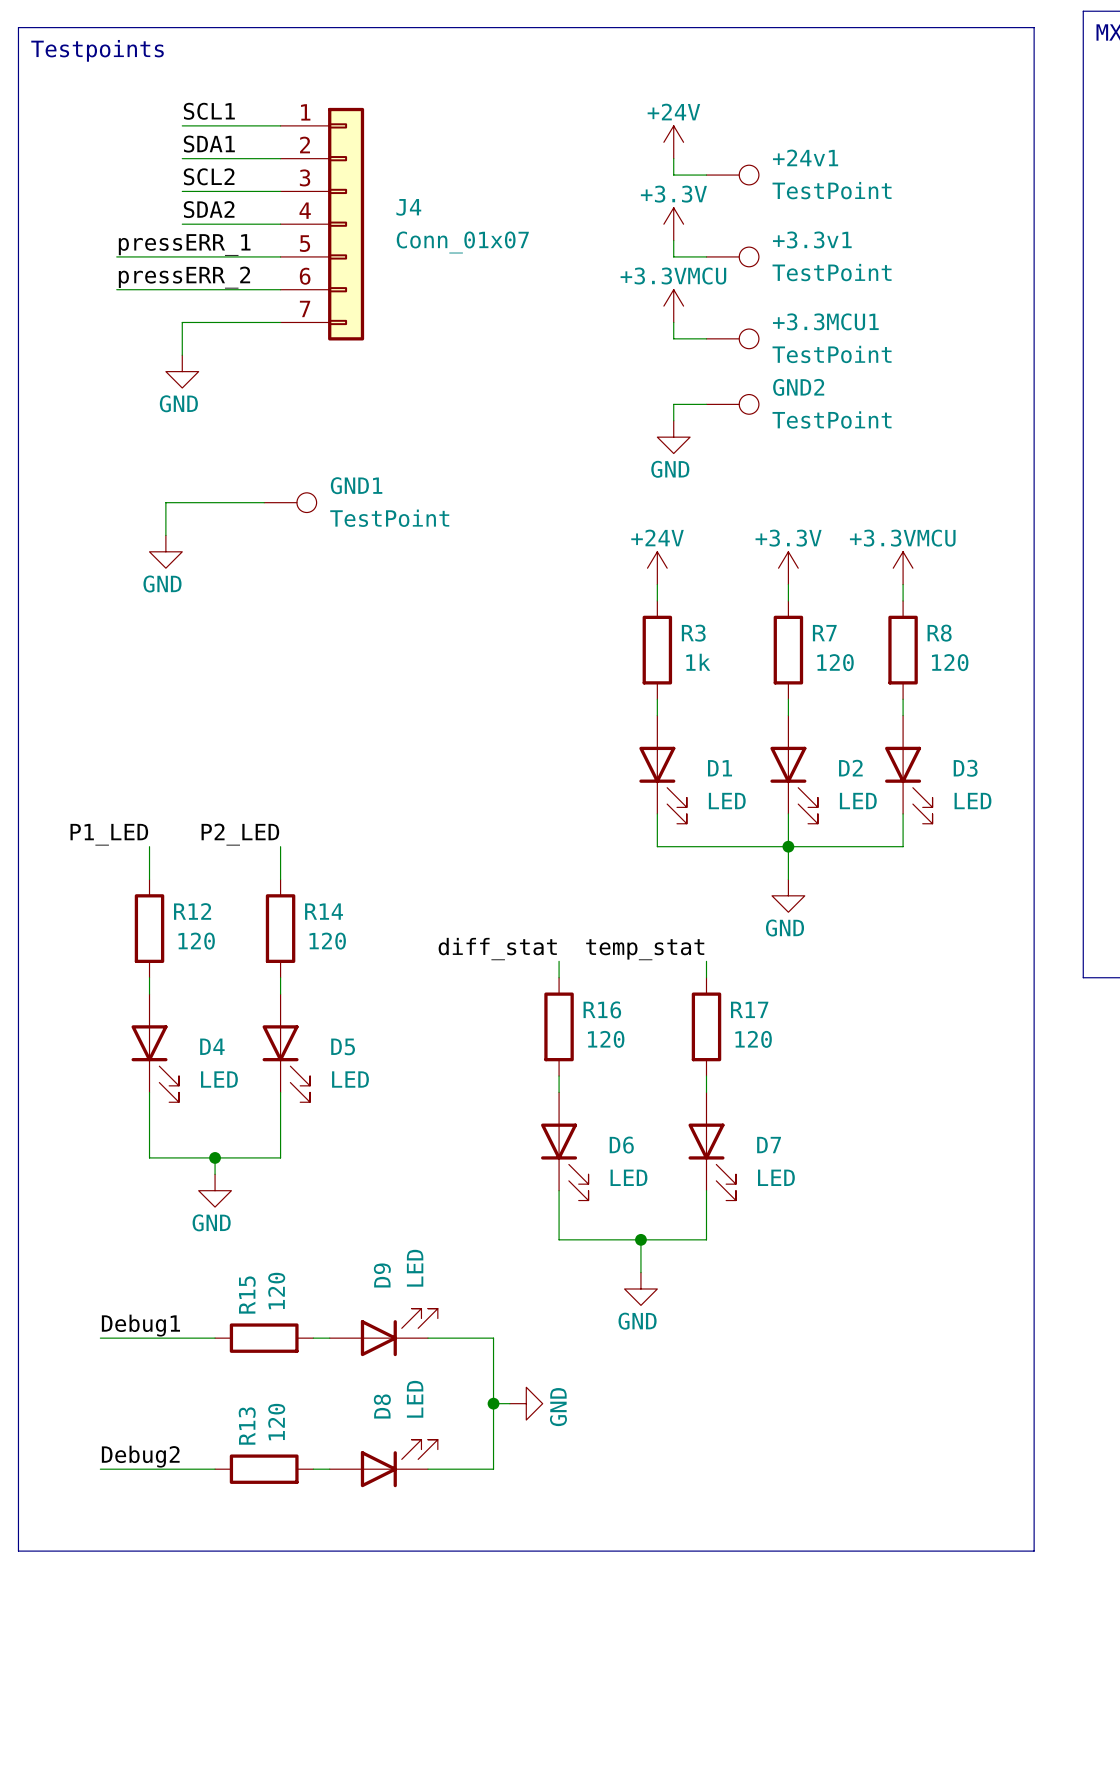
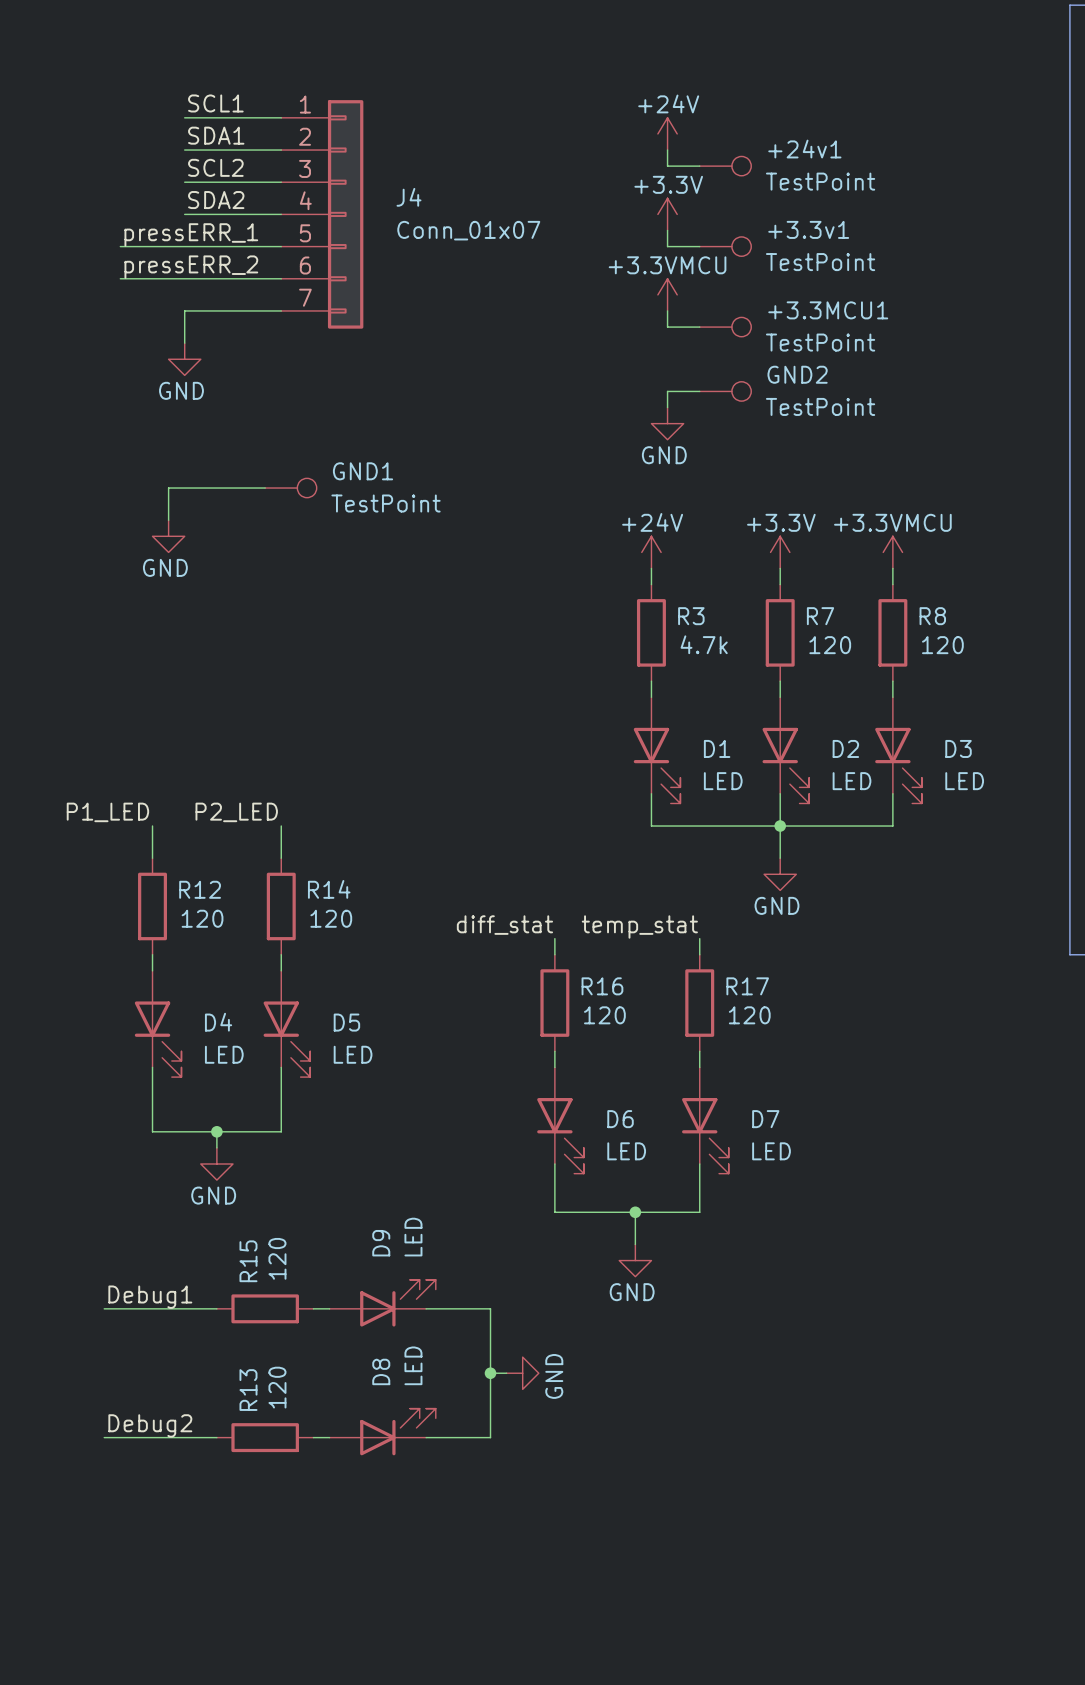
line: (18, 27) (1034, 27) (1034, 1551) (18, 1551) (18, 27) -> none
text: Testpoints (97, 50) -> none
R3 value: 1k (698, 662) -> 4.7k (704, 644)

